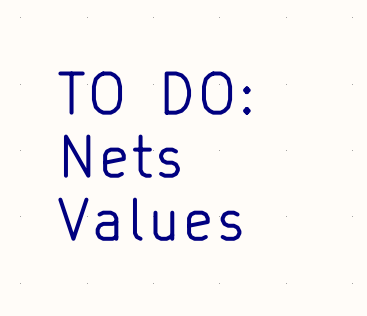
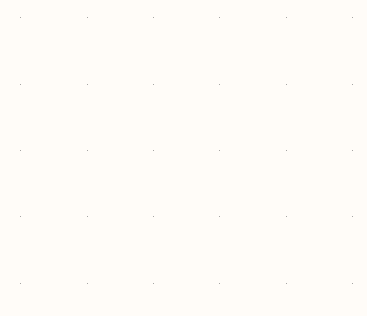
text: TO DO: (154, 93) -> none
text: Nets (121, 156) -> none
text: Values (149, 219) -> none

